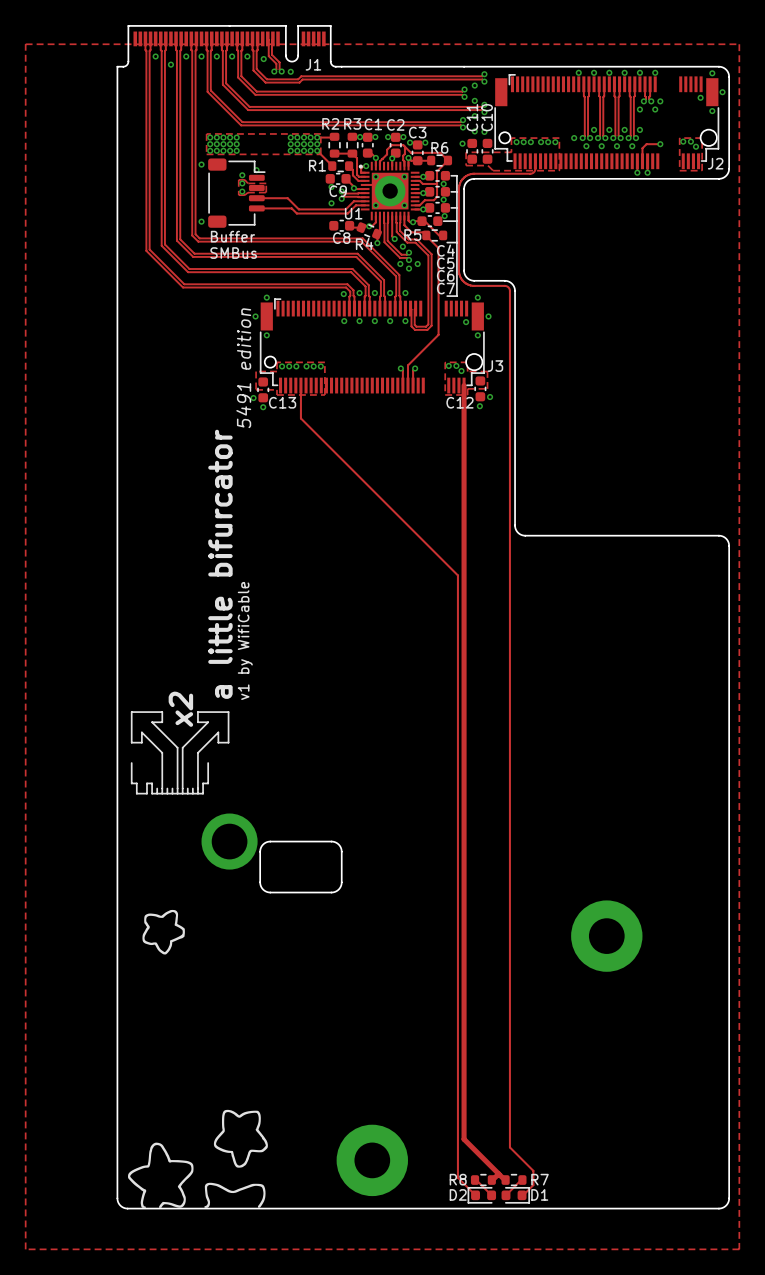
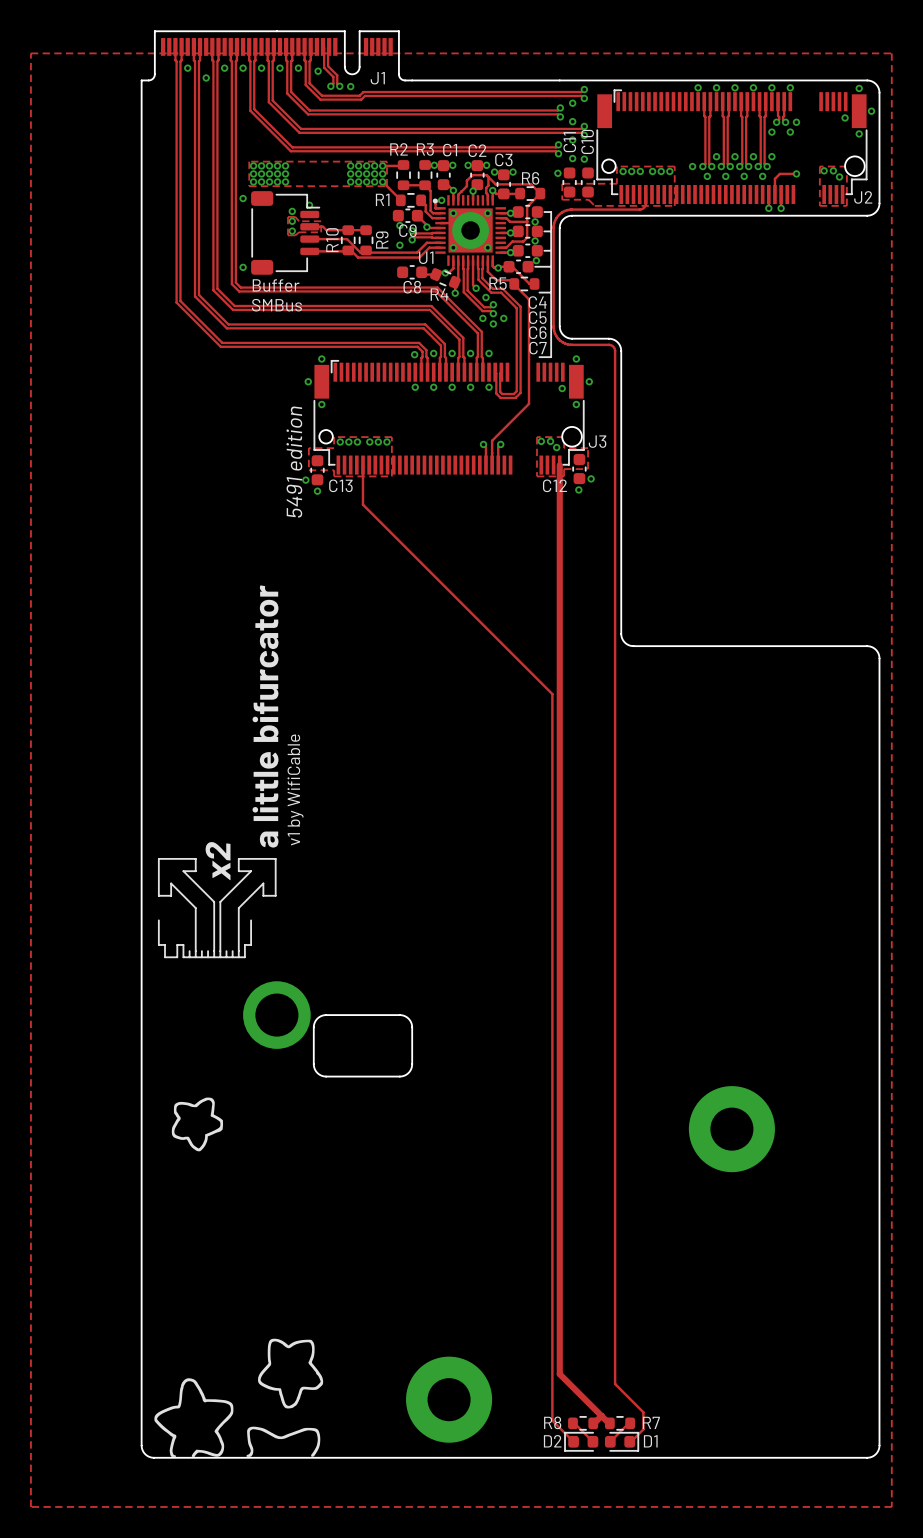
track: none -> (309, 226) (323, 226) (326, 230) (366, 230)
R10: none -> (348, 240)
R9: none -> (366, 240)

